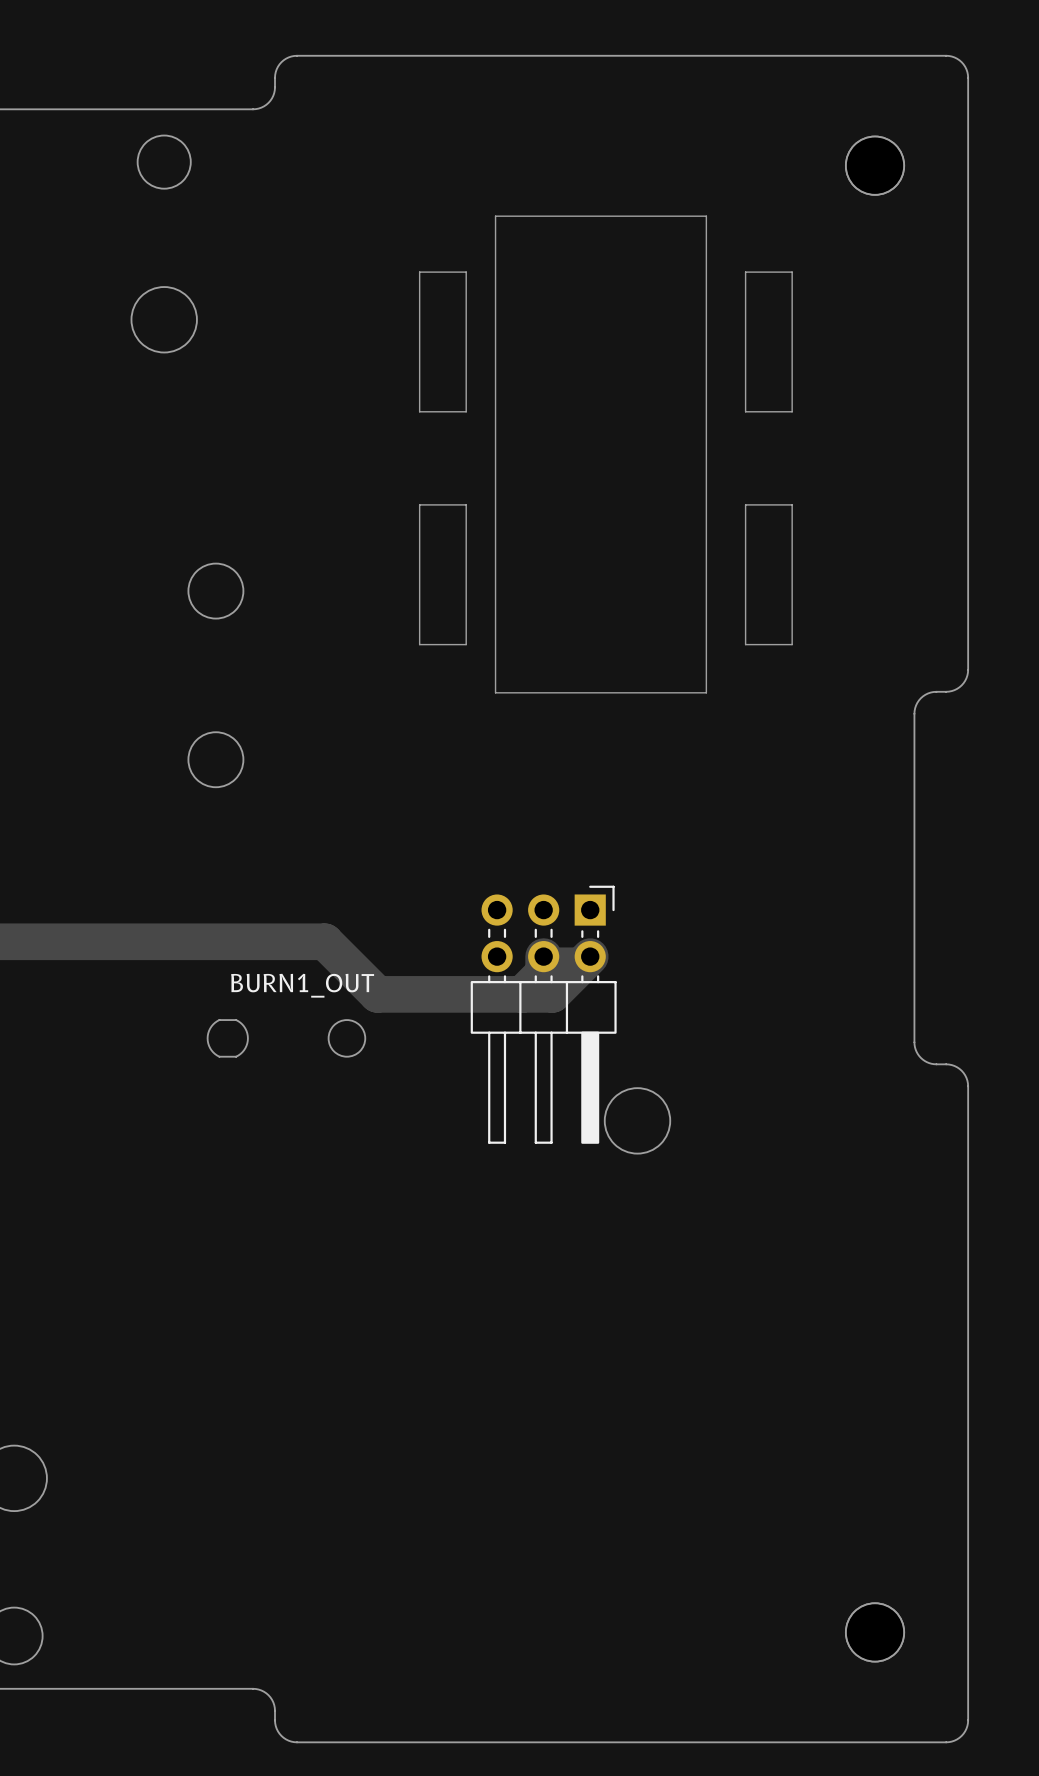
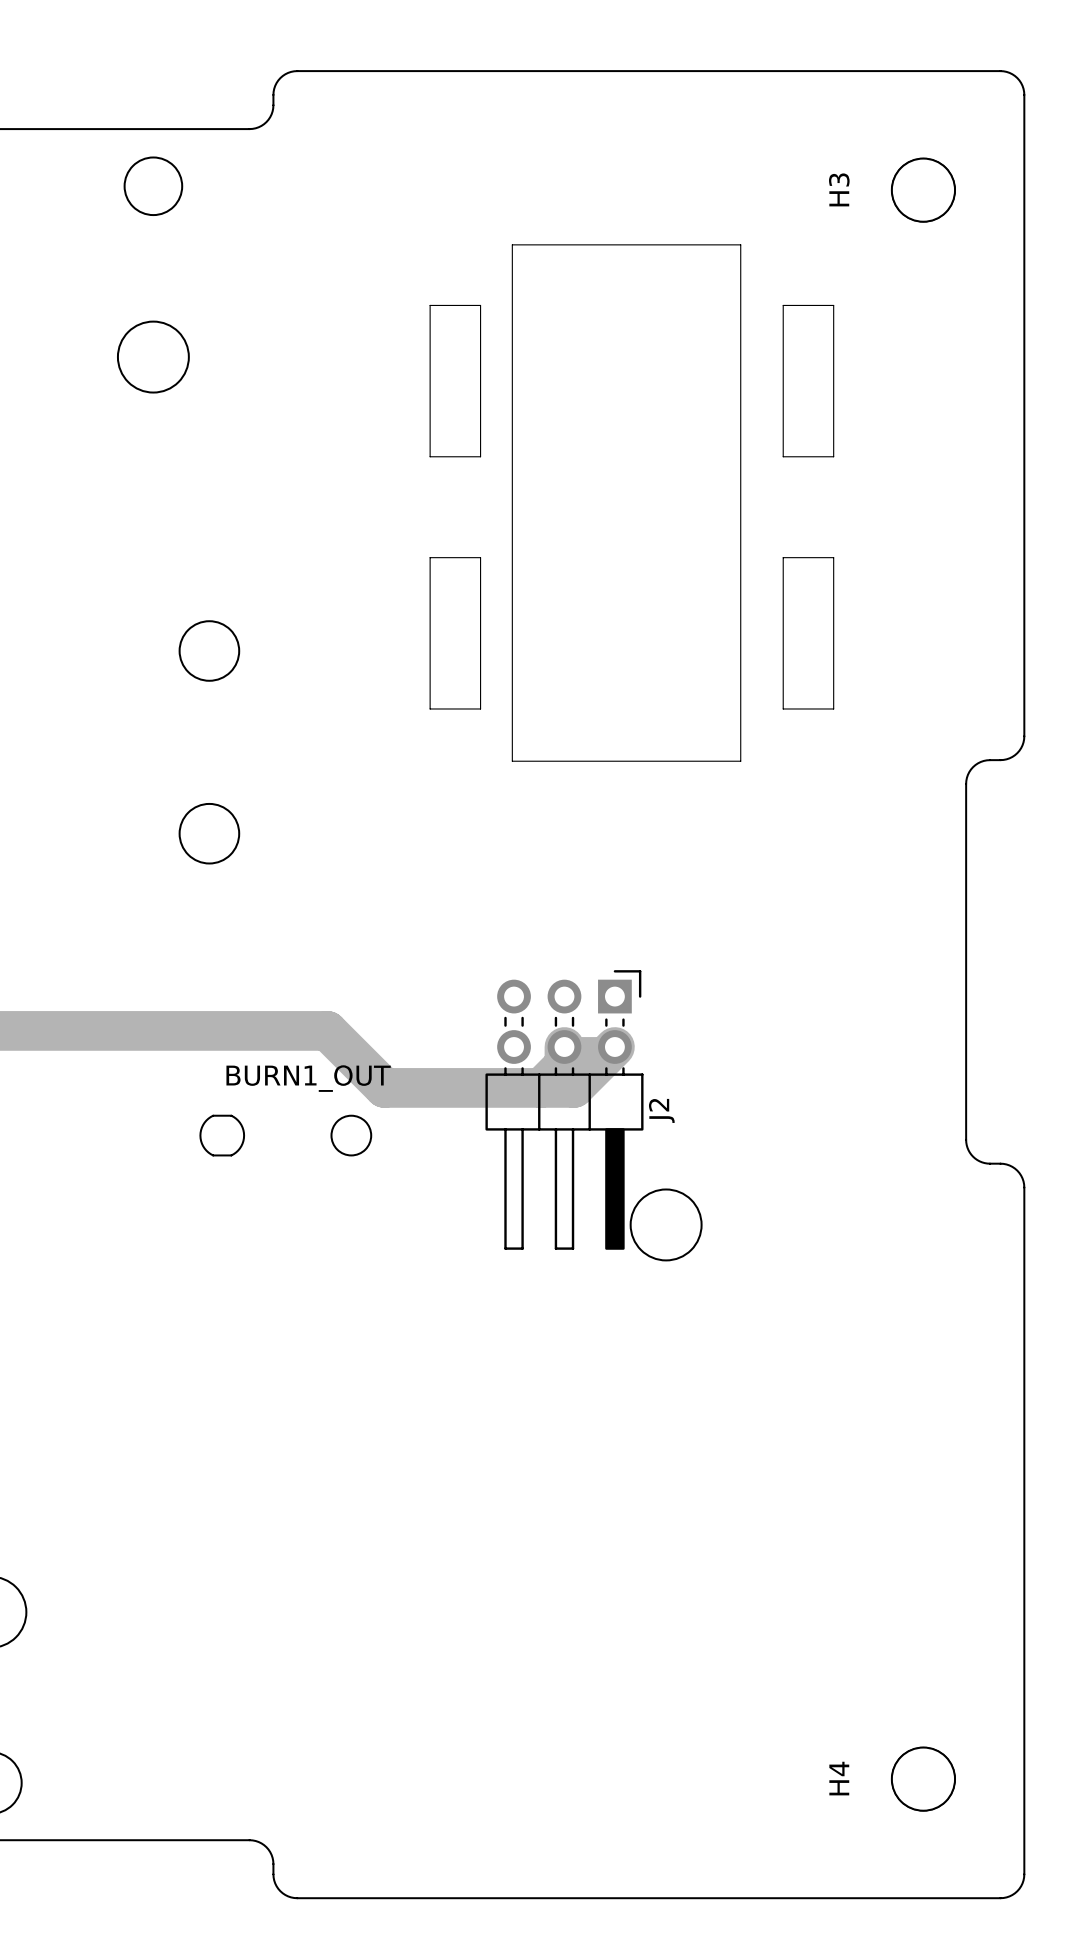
H3 name: none -> H3 (839, 189)
J2 name: none -> J2 (661, 1110)
H4 name: none -> H4 (839, 1778)

